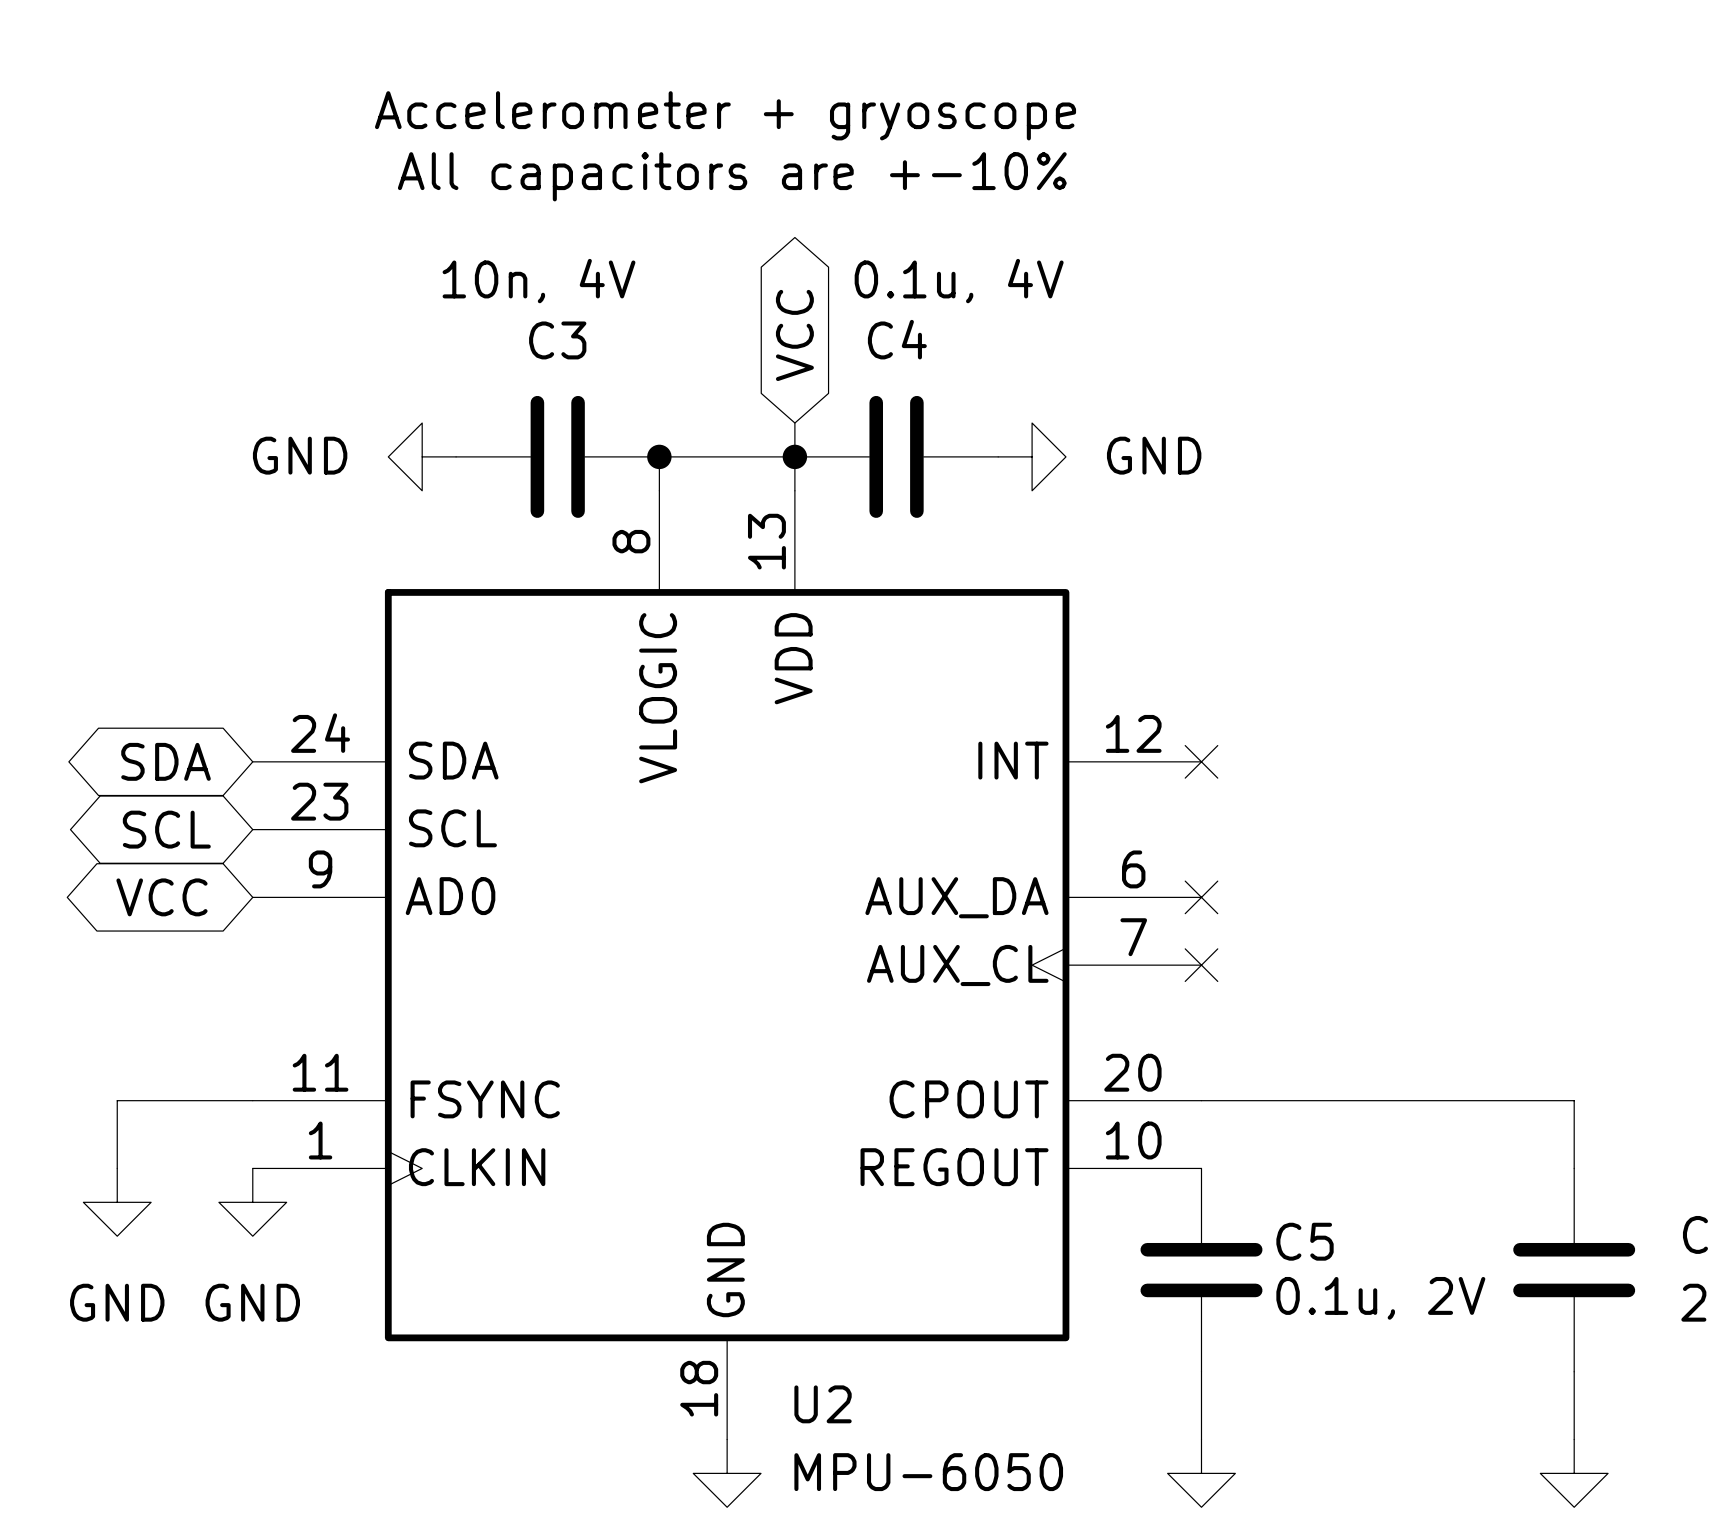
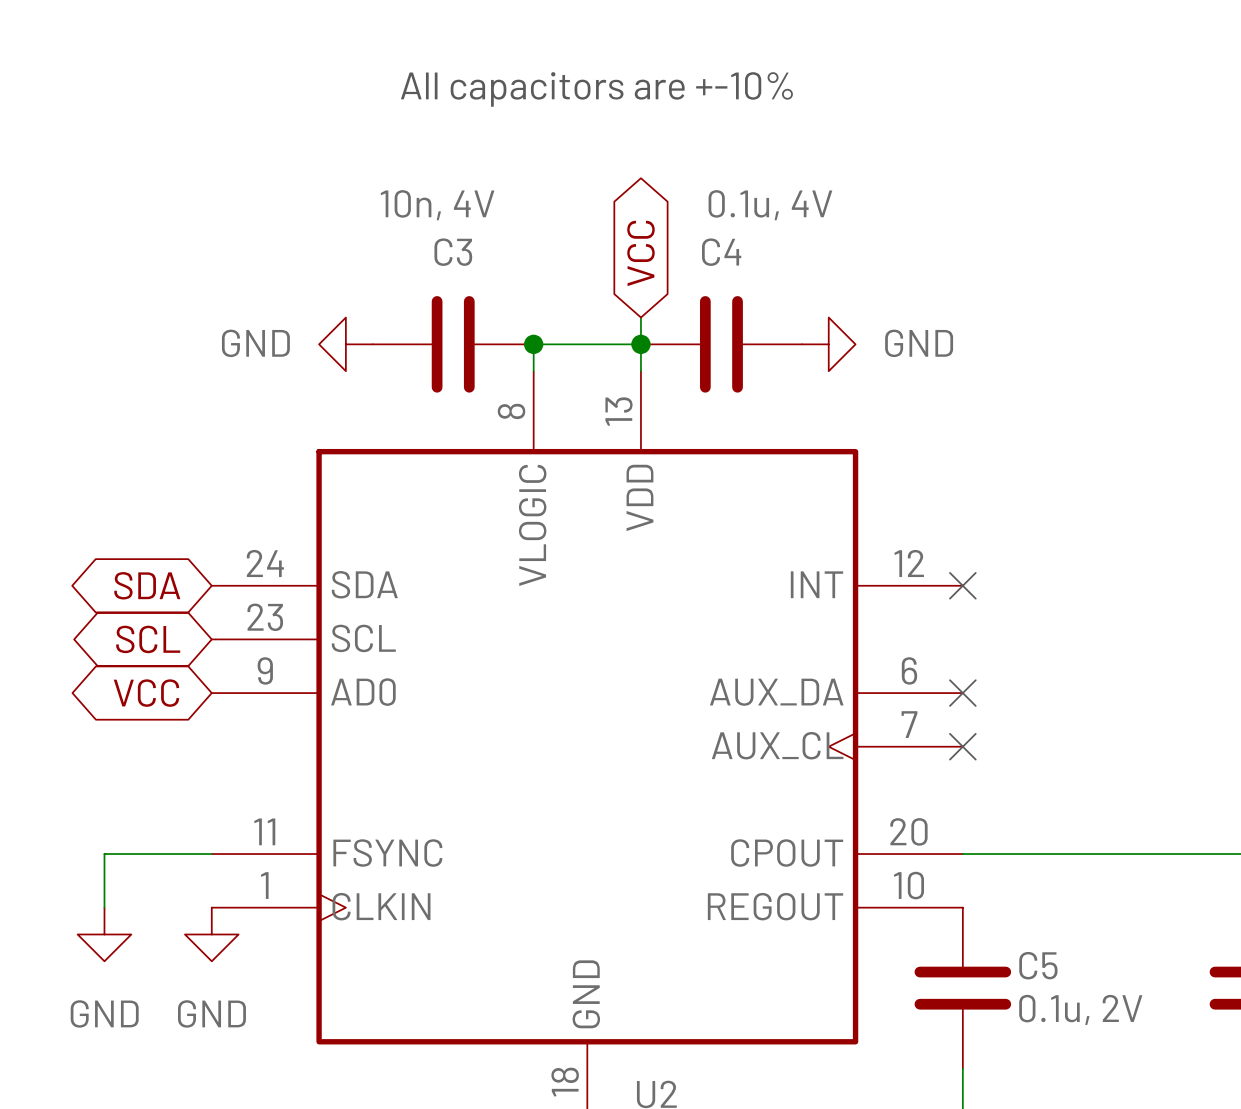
text: Accelerometer + gryoscope (725, 115) -> none
text position: All capacitors are +-10% (732, 176) -> All capacitors are +-10% (596, 89)

